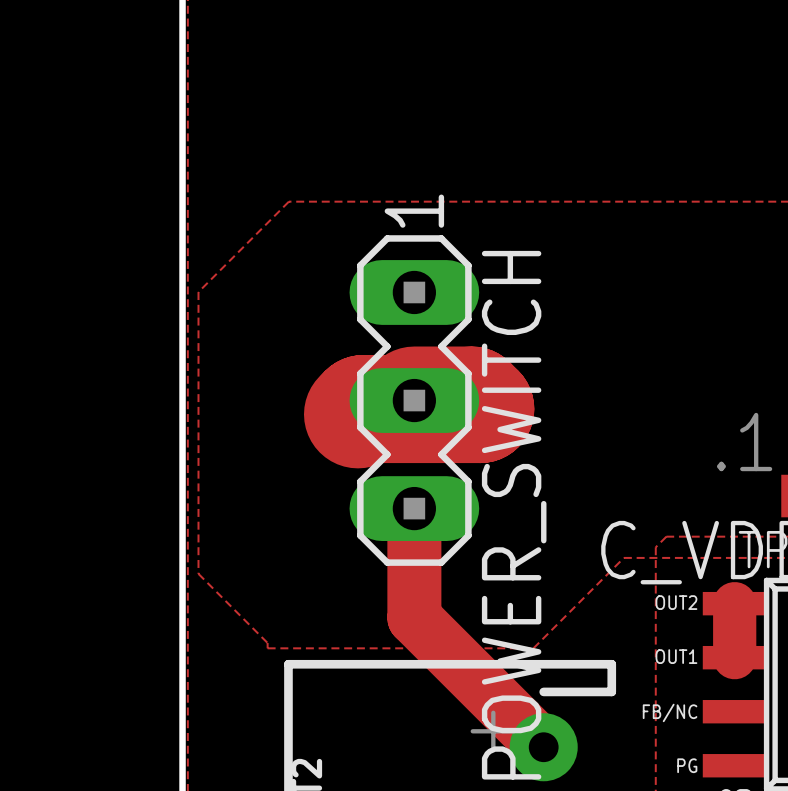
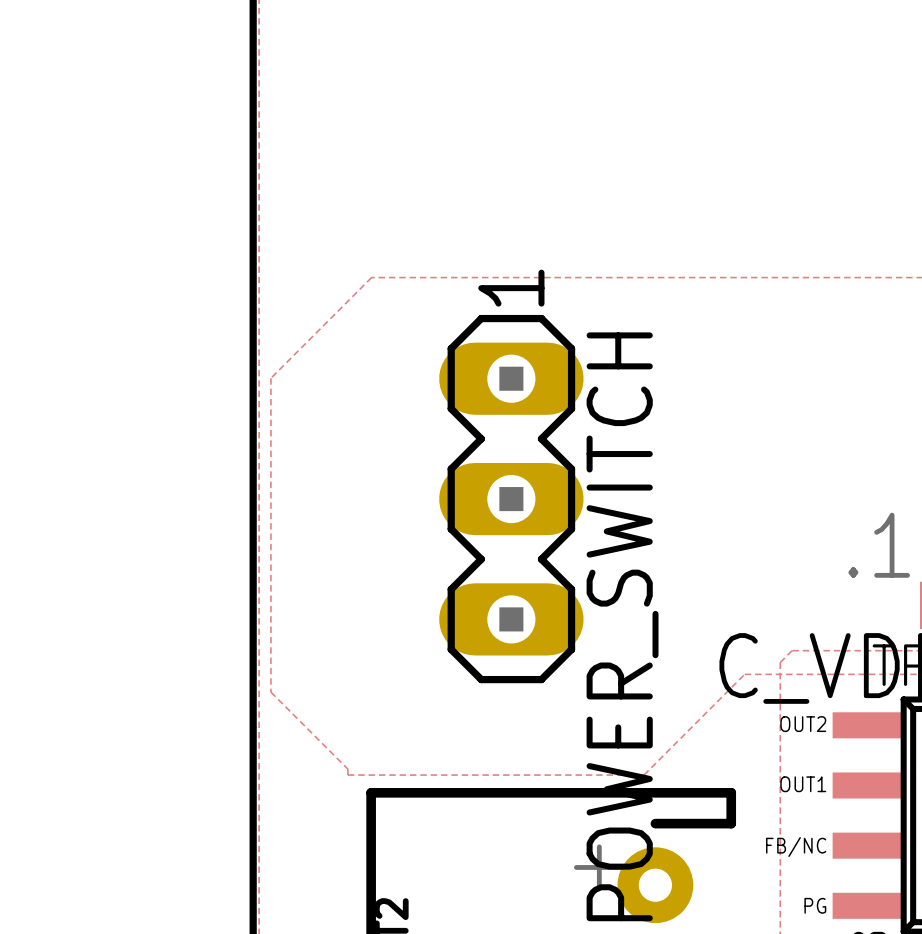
track: (414, 400) (471, 400) (480, 409) (363, 409) (358, 414) -> none
track: (414, 508) (414, 617) (543, 747) -> none
track: (734, 603) (734, 657) -> none

